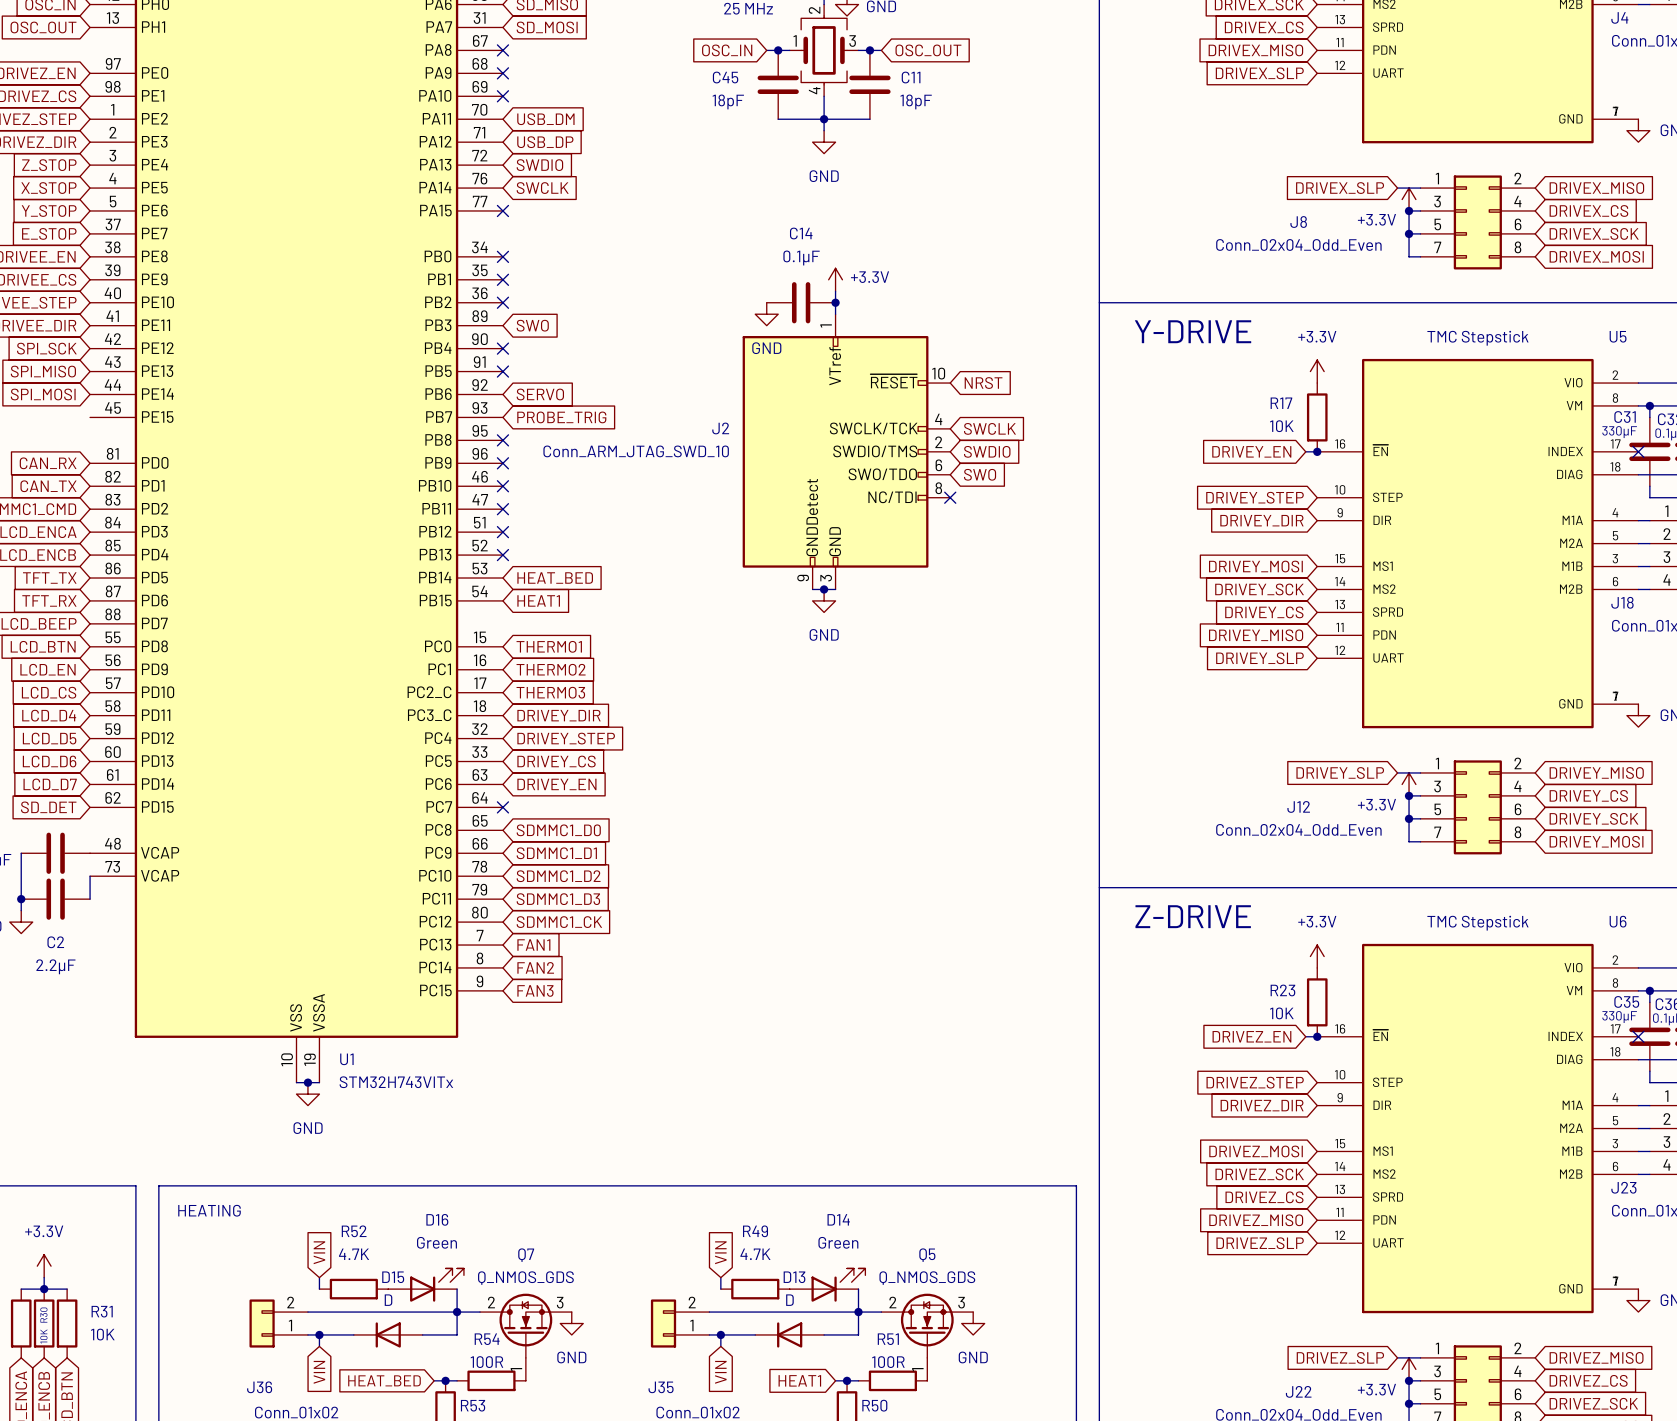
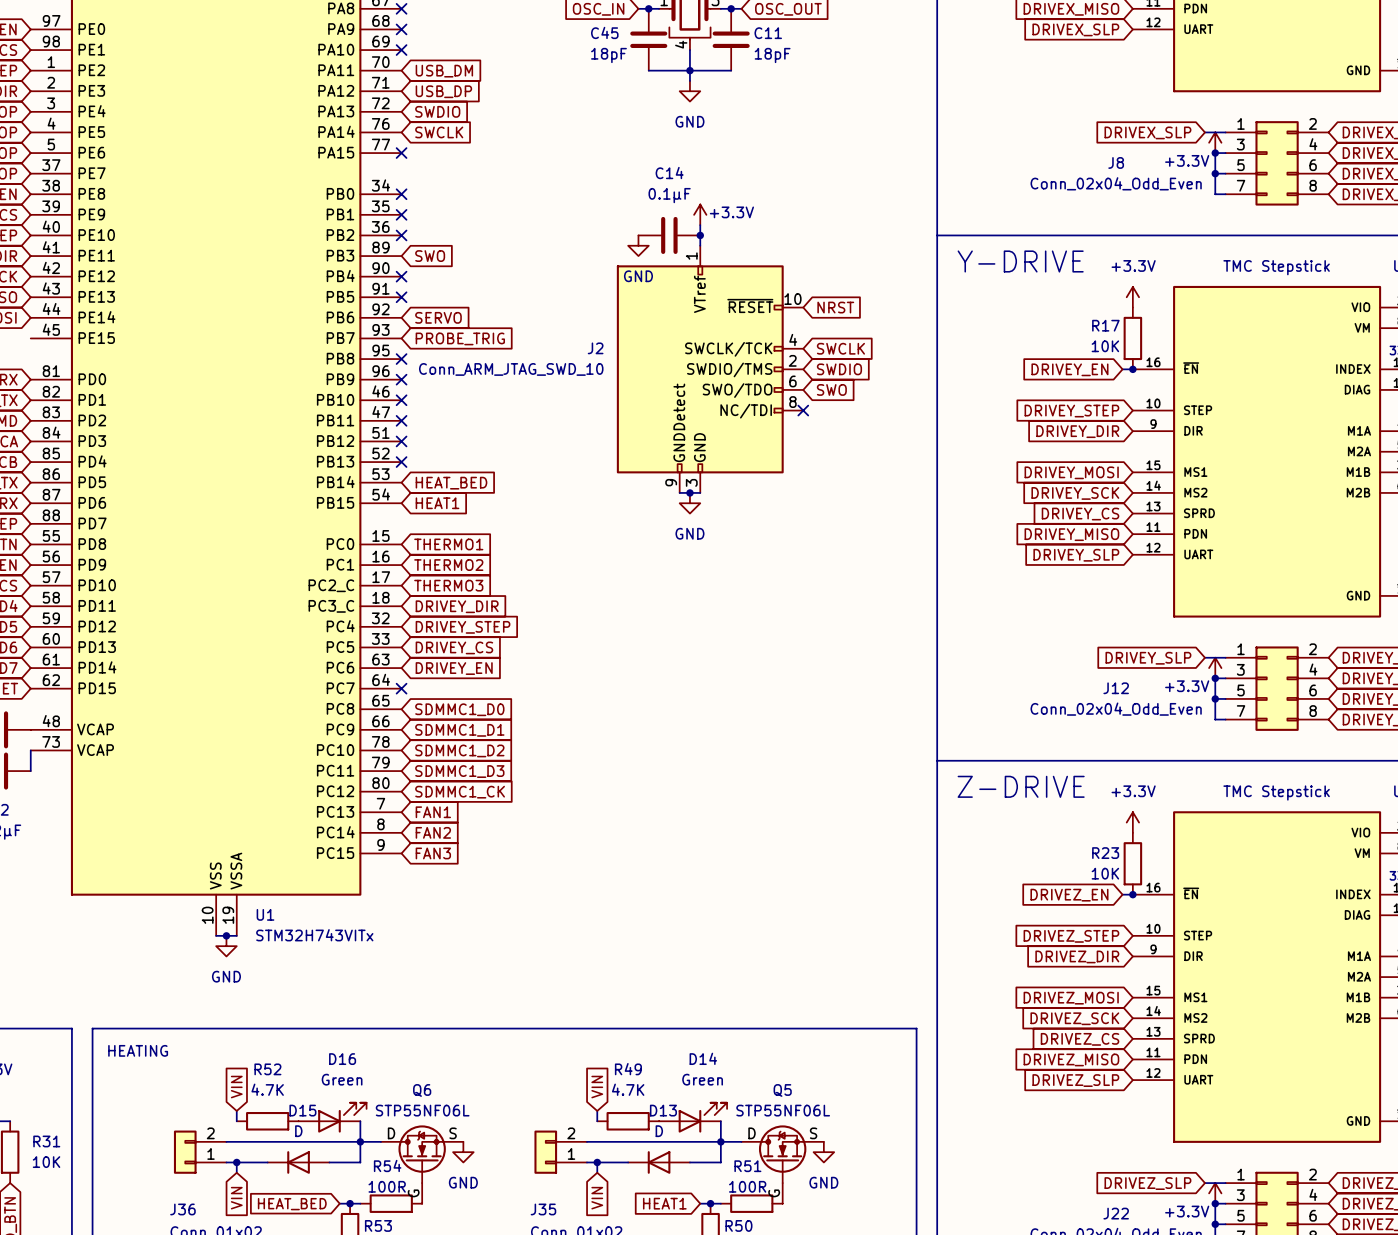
Q5 value: Q_NMOS_GDS (927, 1278) -> STP55NF06L (783, 1110)
Q5 symbol: [881, 1293, 974, 1381] -> [741, 1125, 824, 1204]
Q7: Q_NMOS_GDS (525, 1337) -> none
Q6: none -> STP55NF06L (422, 1164)

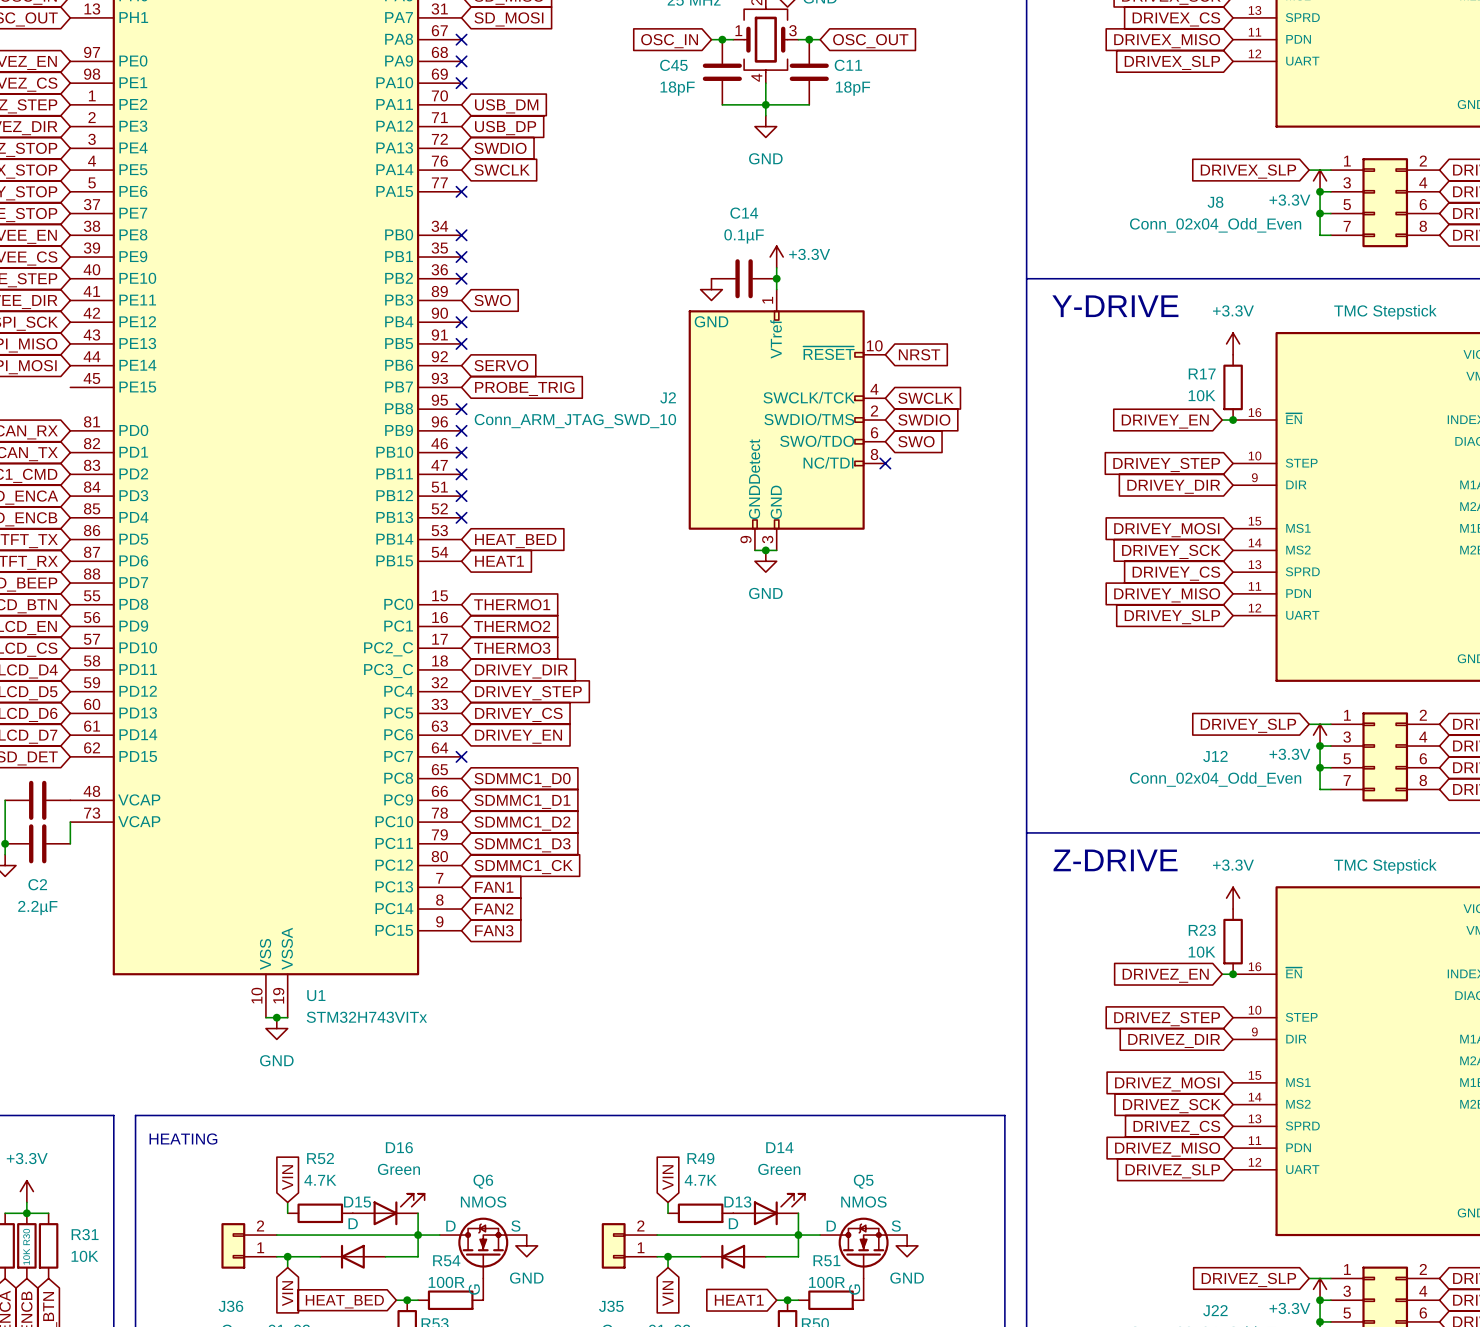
Q6 value: STP55NF06L (422, 1110) -> NMOS (483, 1202)
Q5 value: STP55NF06L (783, 1110) -> NMOS (863, 1202)

